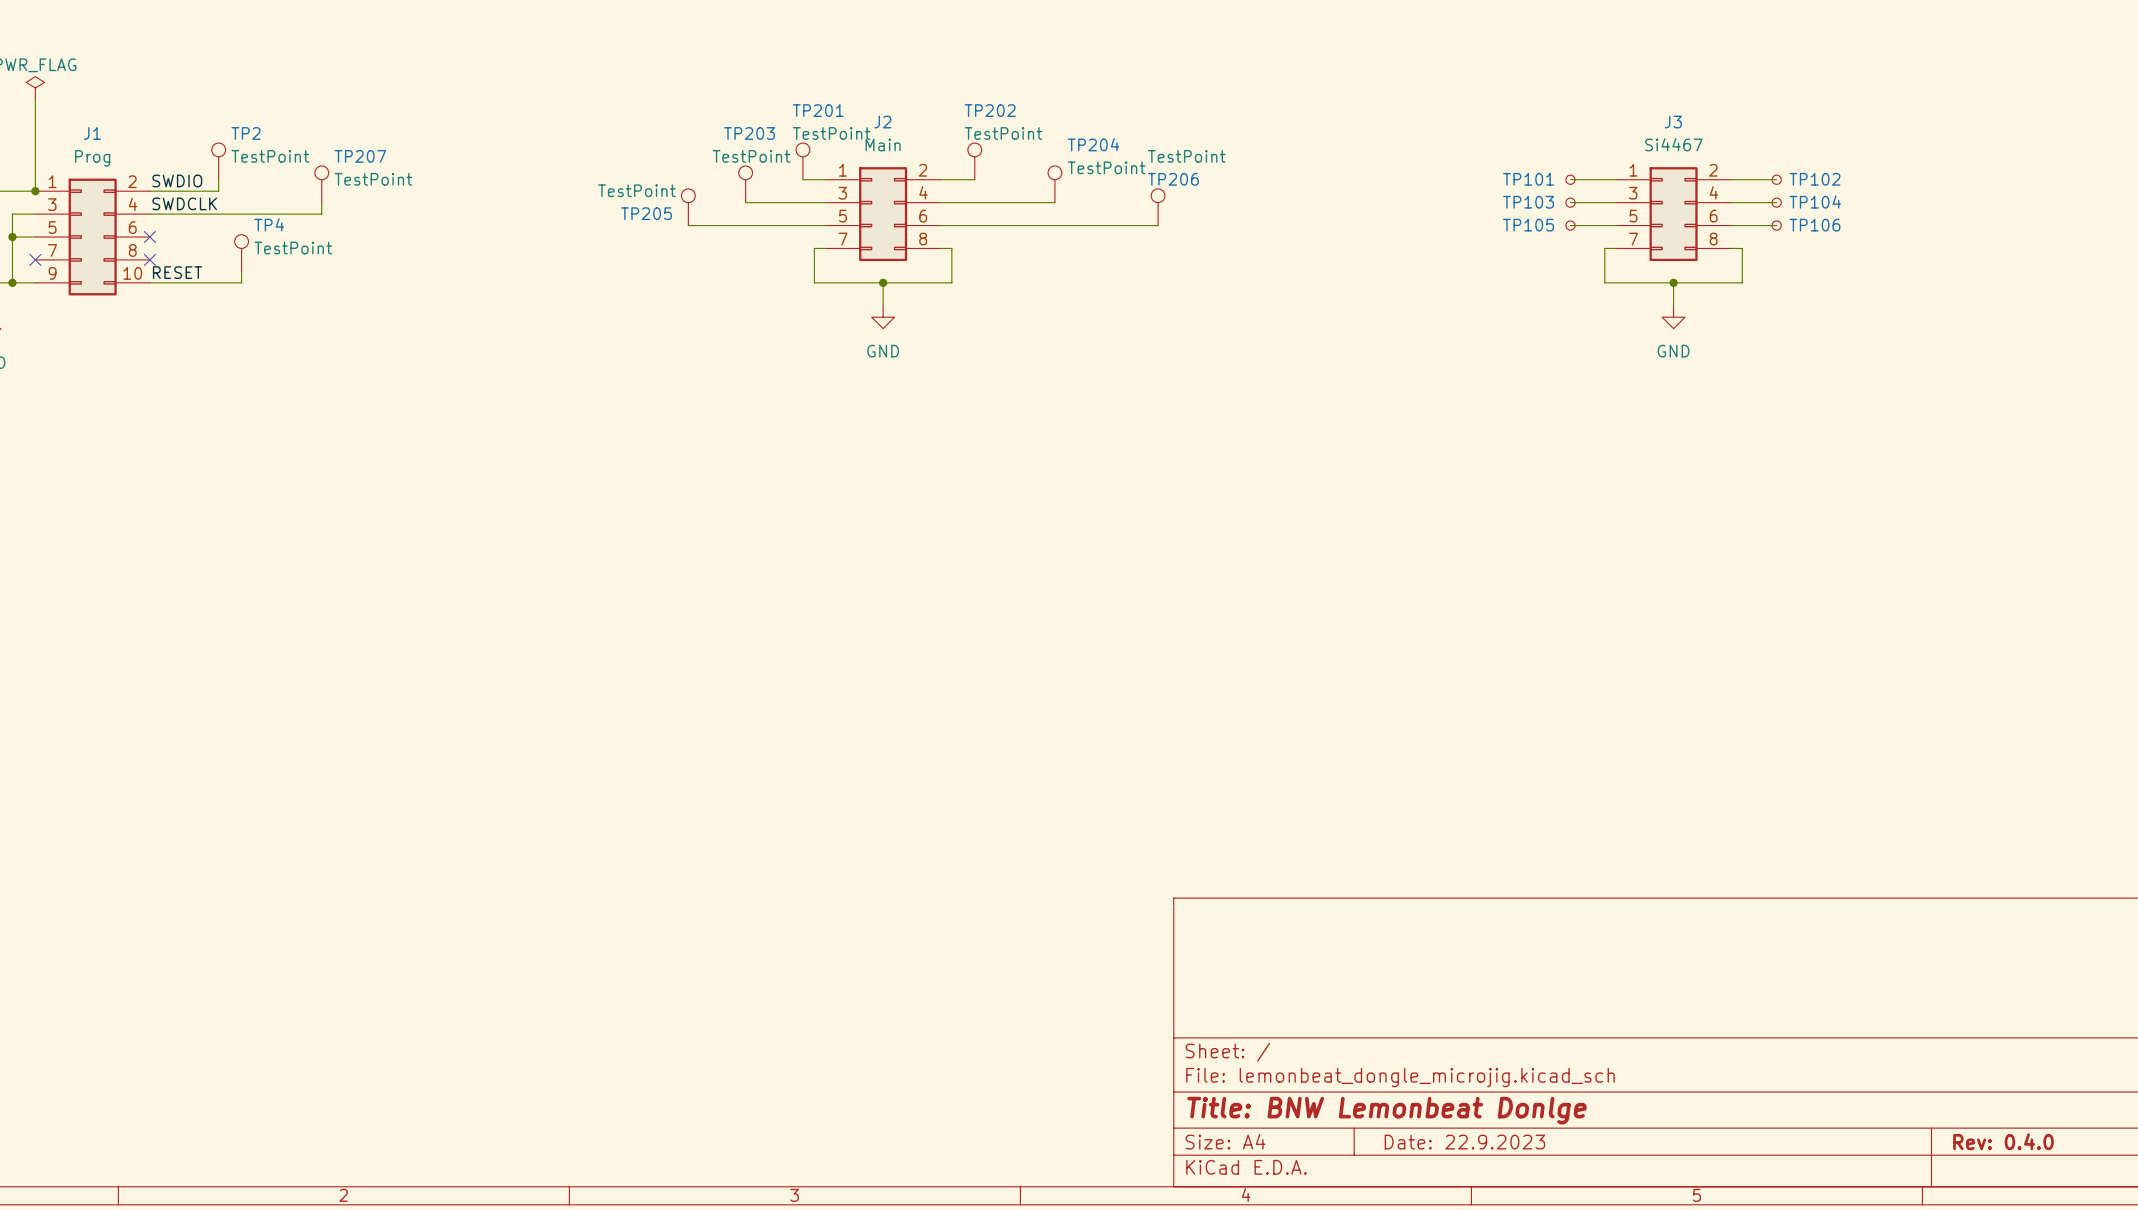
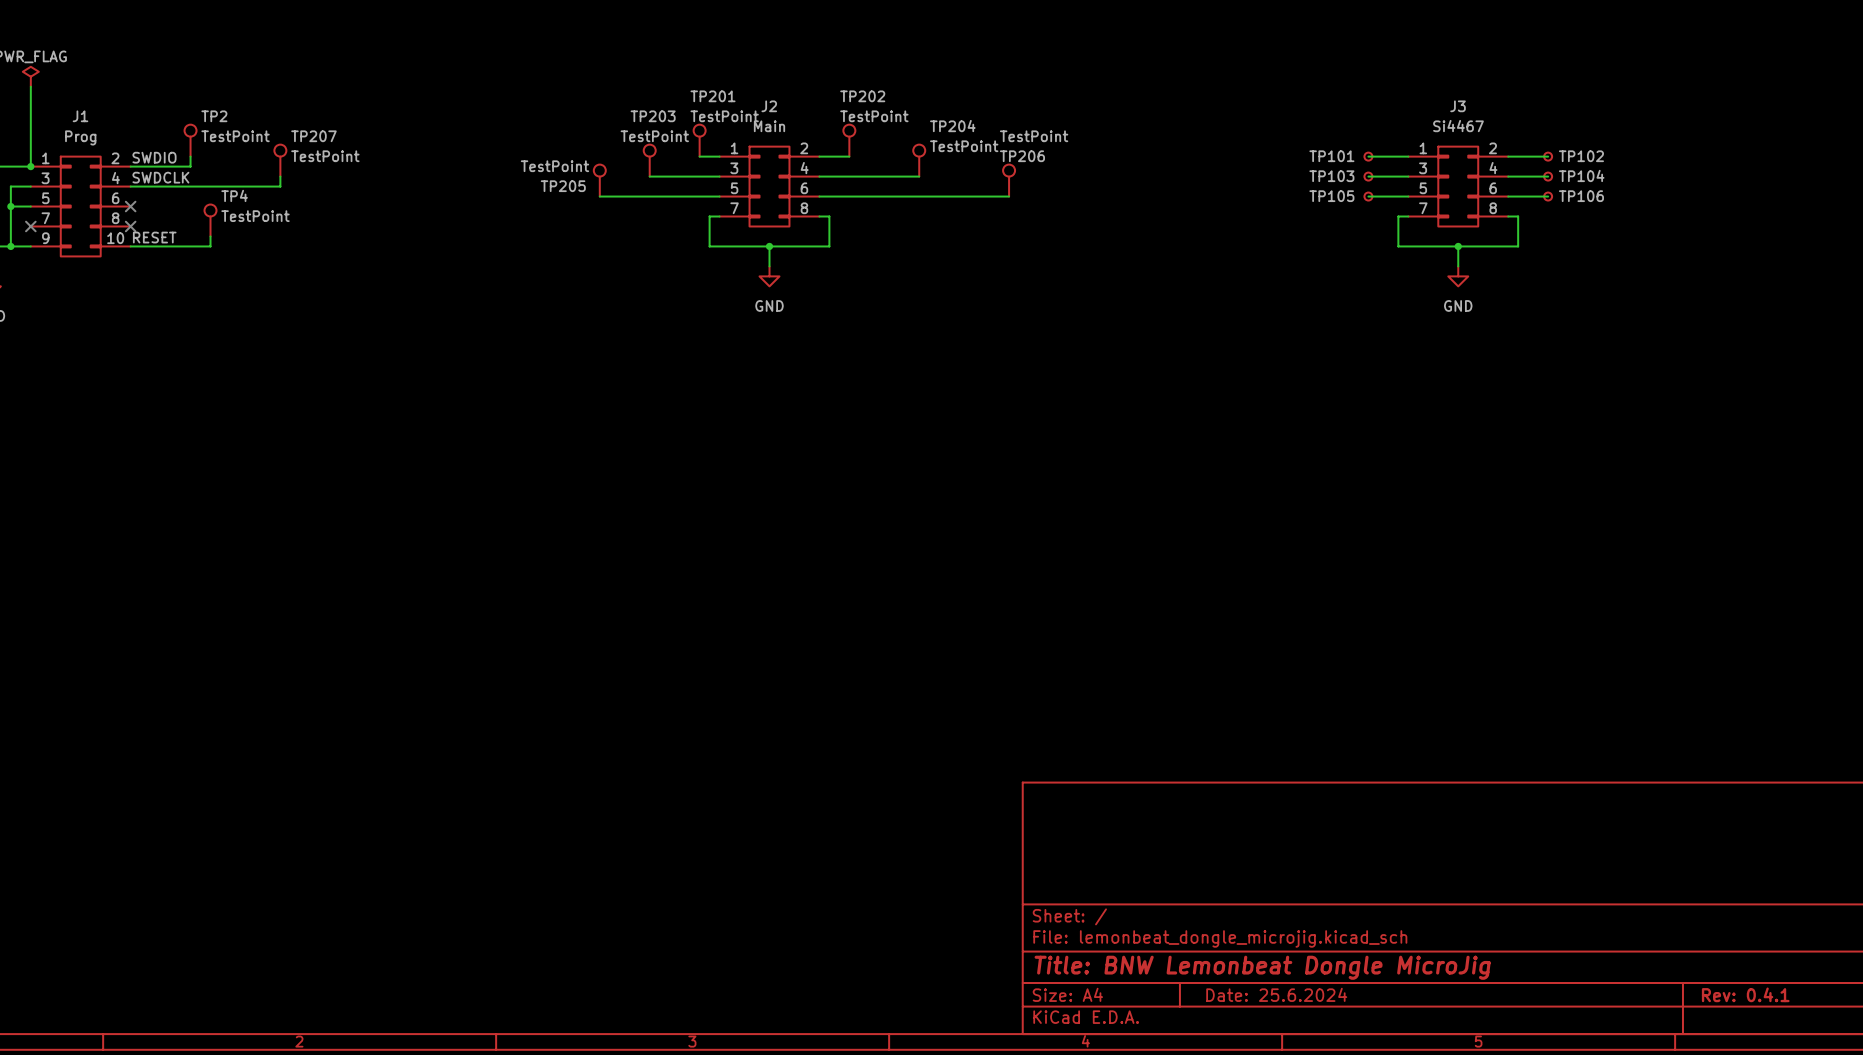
title block: Title: BNW Lemonbeat Donlge (1387, 1110) -> Title: BNW Lemonbeat Dongle MicroJig (1262, 967)
title block: Rev: 0.4.0 (2003, 1141) -> Rev: 0.4.1 (1745, 994)
title block: Date: 22.9.2023 (1464, 1142) -> Date: 25.6.2024 (1276, 994)

